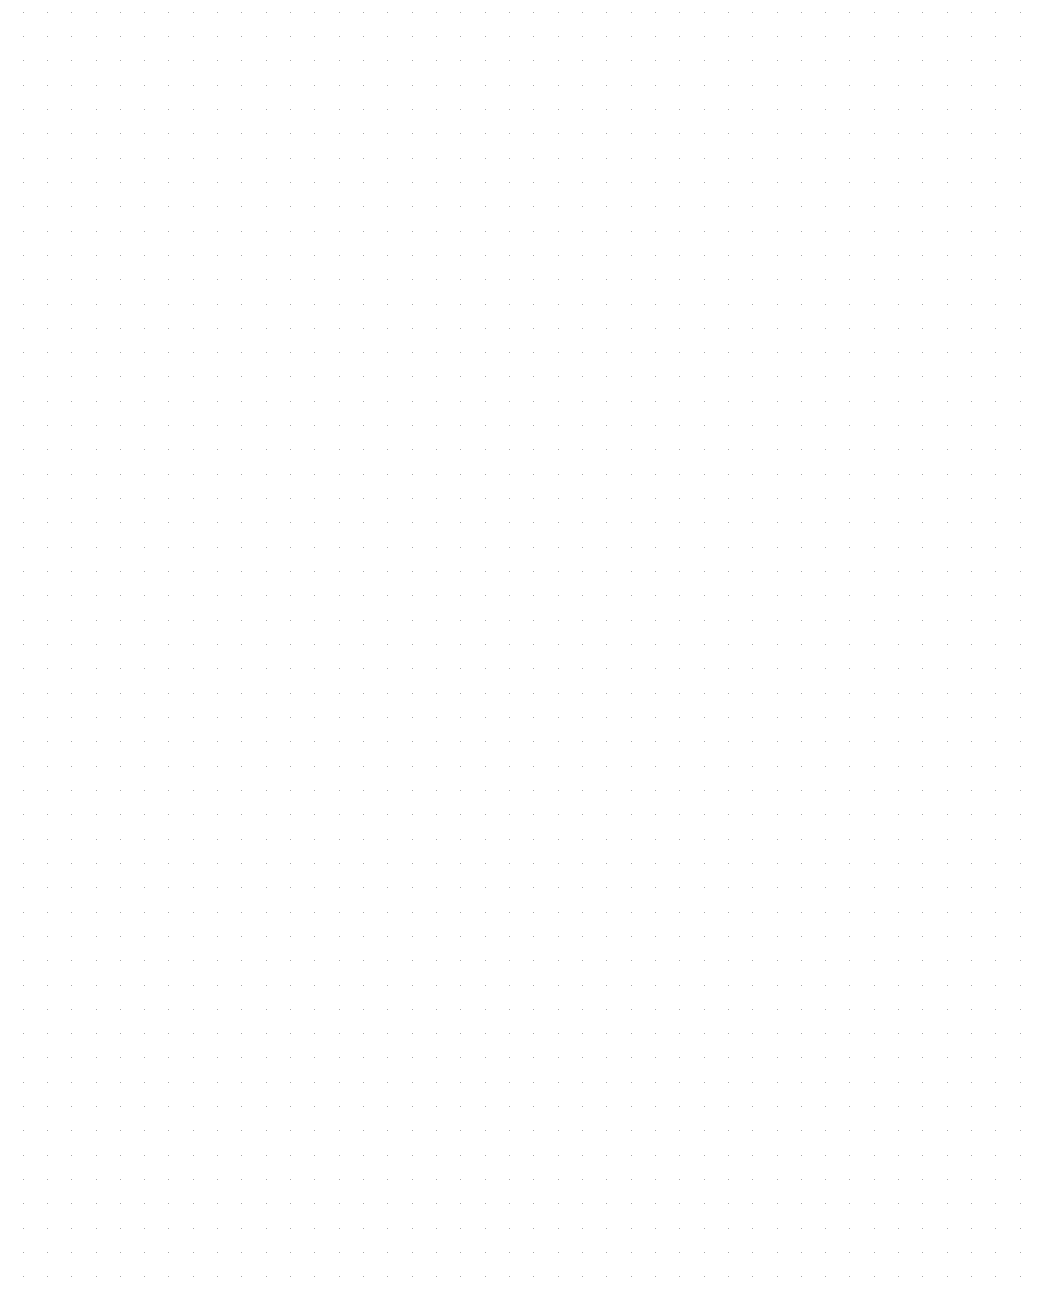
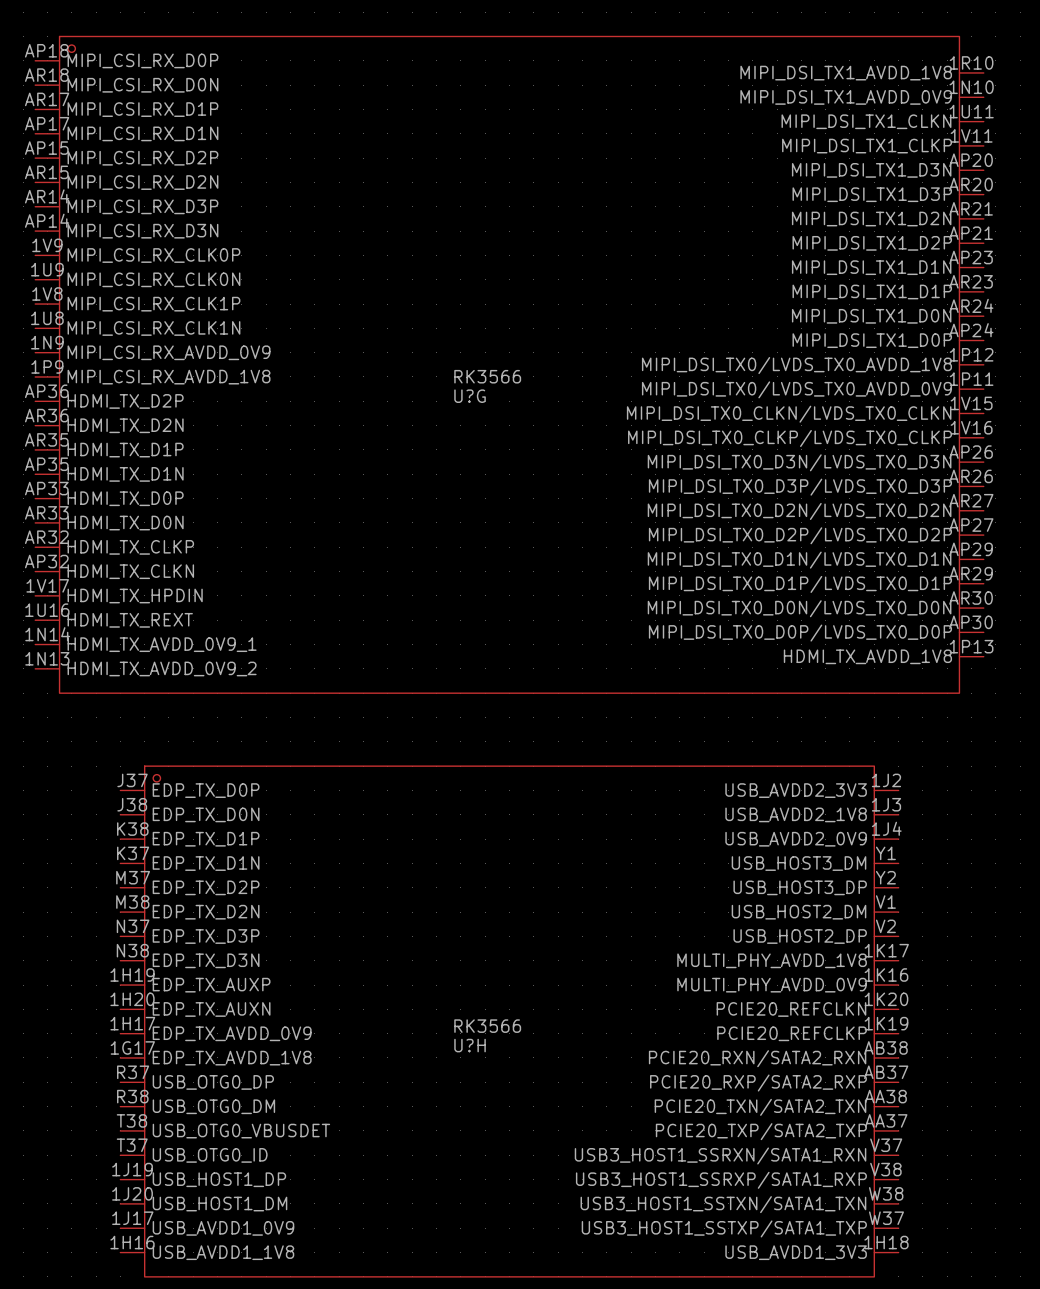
U?G: none -> RK3566 (509, 364)
U?H: none -> RK3566 (509, 1021)

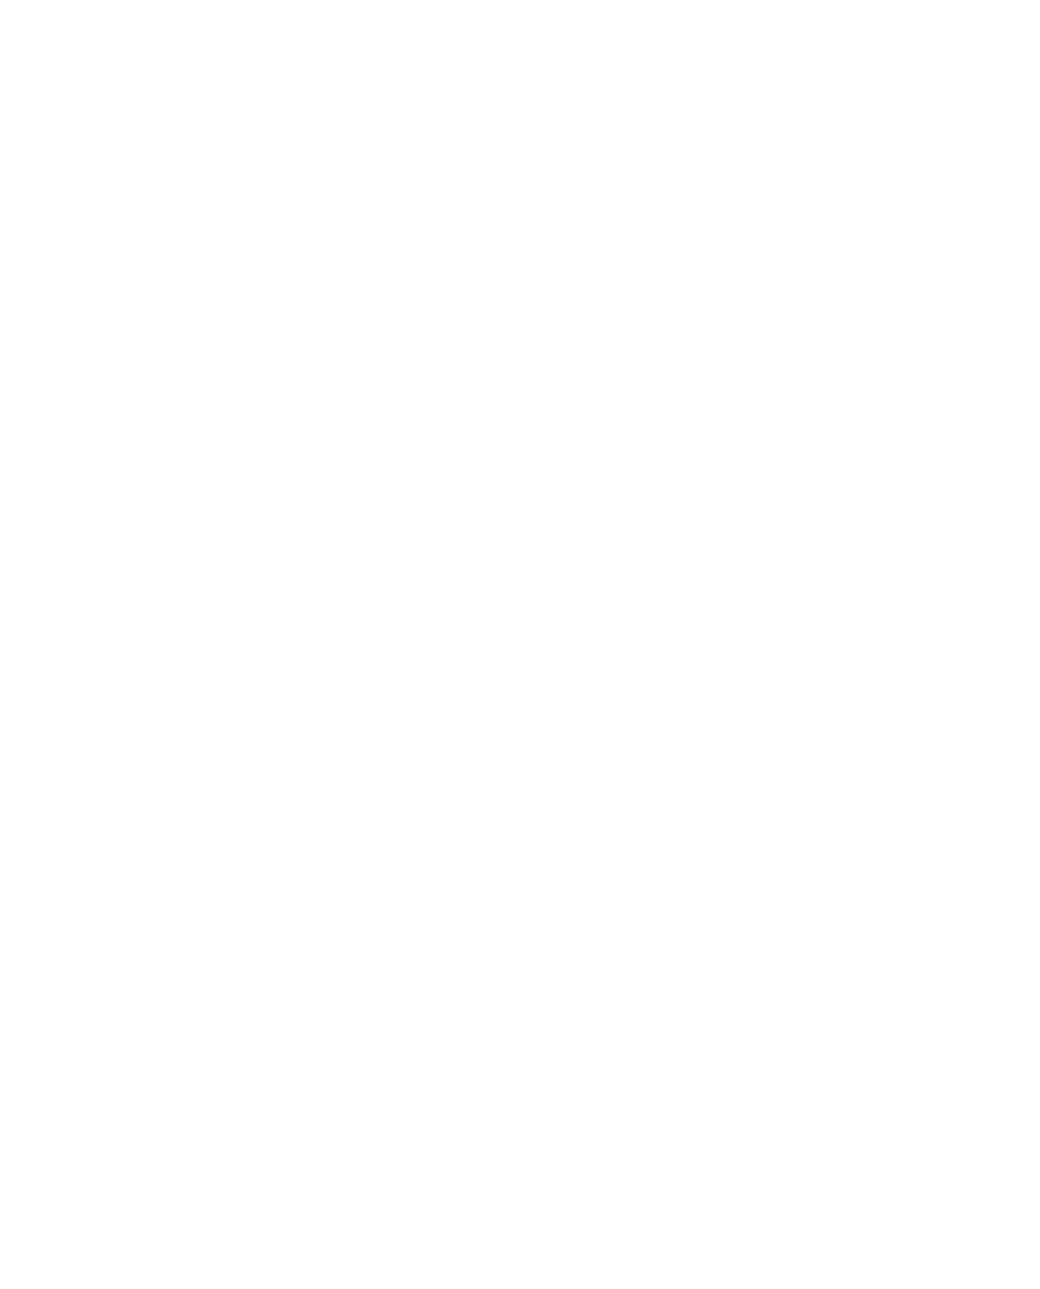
U?G: RK3566 (509, 364) -> none
U?H: RK3566 (509, 1021) -> none

